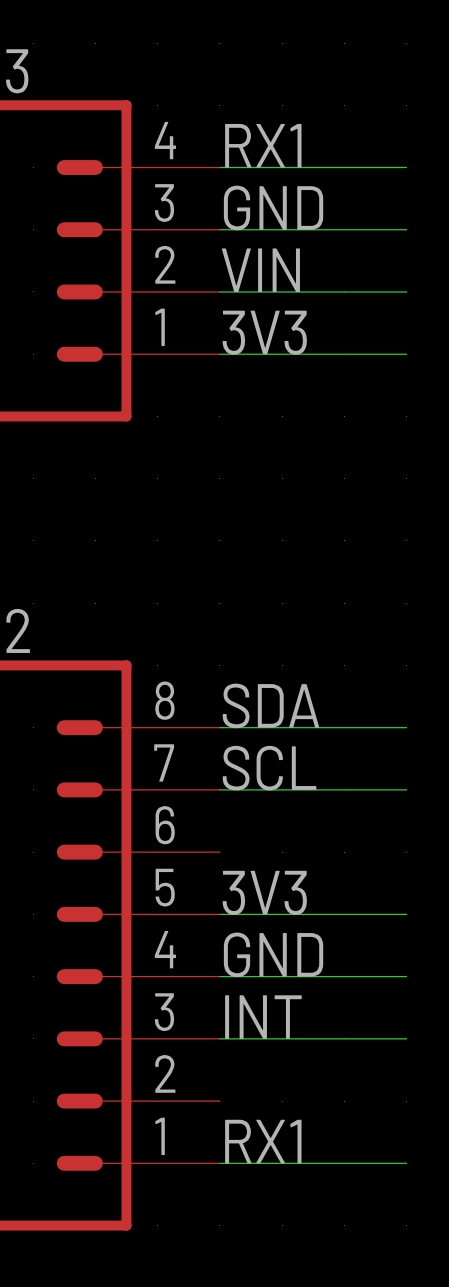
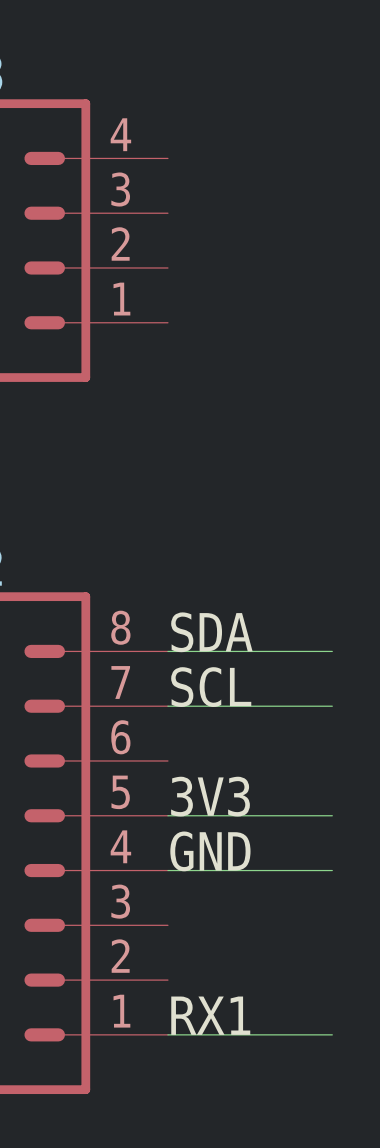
label: RX1 (263, 145) -> none
wire: (219, 167) (406, 167) -> none
label: GND (273, 207) -> none
wire: (219, 229) (406, 229) -> none
label: VIN (260, 270) -> none
wire: (219, 291) (406, 291) -> none
label: 3V3 (264, 332) -> none
wire: (219, 354) (406, 354) -> none
label: INT (263, 1017) -> none
wire: (219, 1038) (406, 1038) -> none

